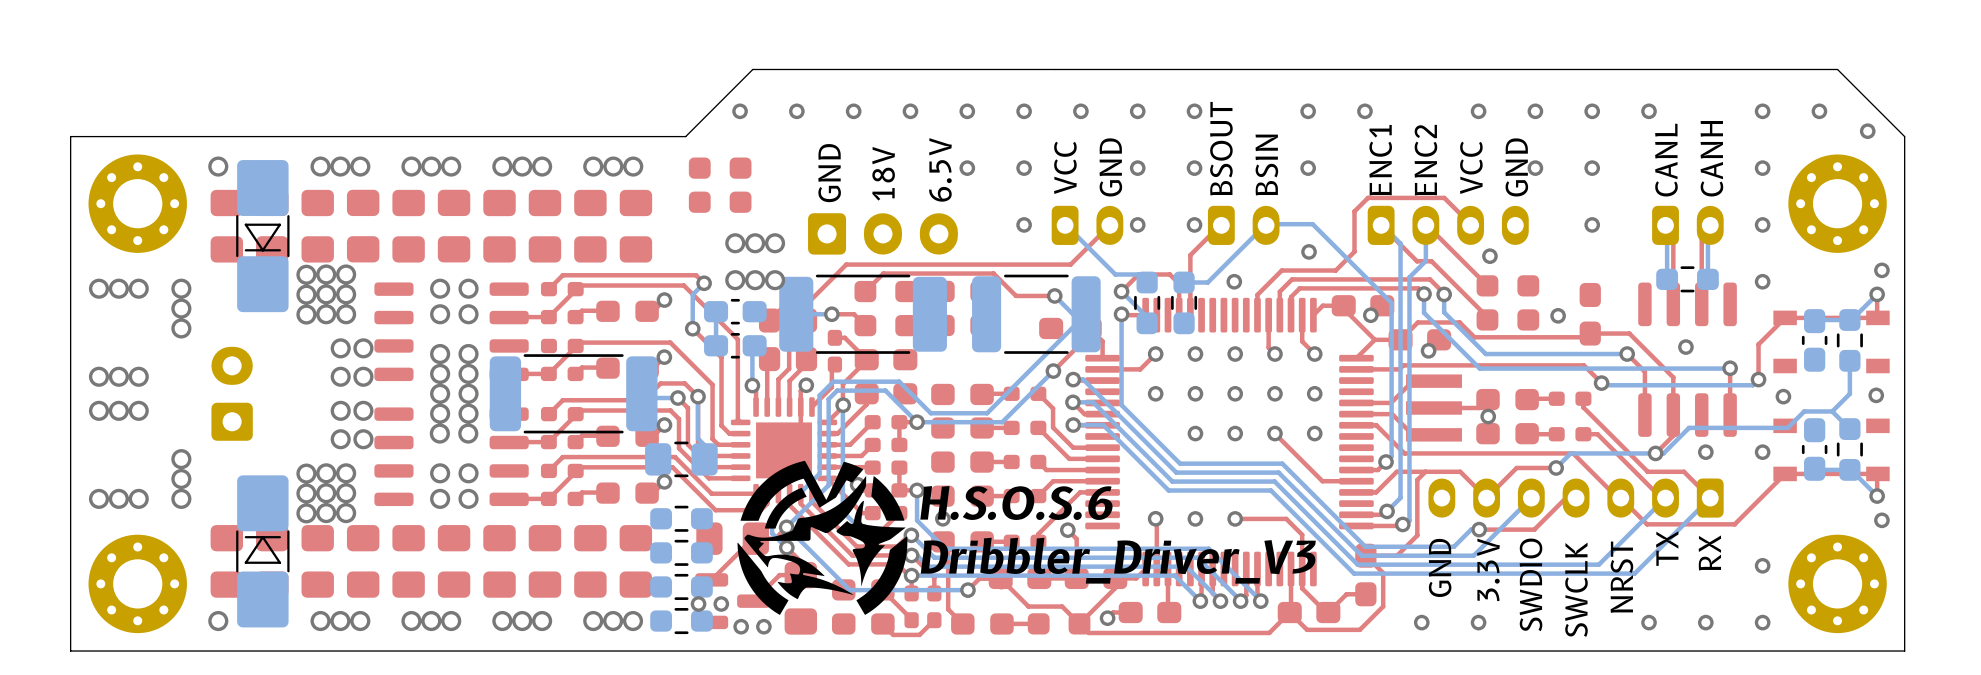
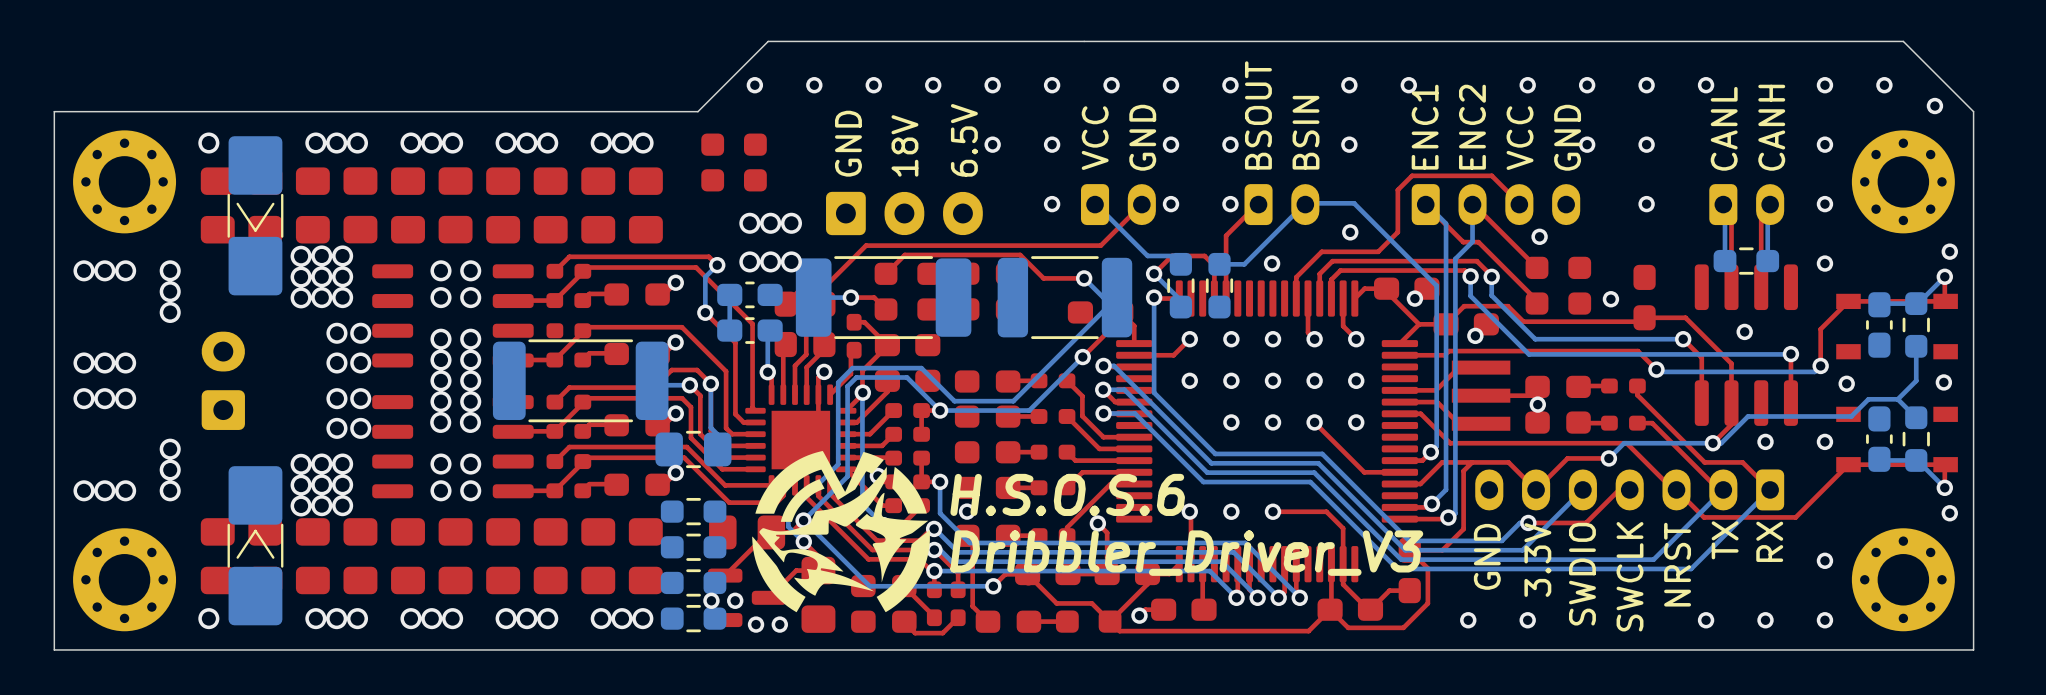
part footprint: [236, 160, 290, 313] -> [227, 136, 284, 296]
part footprint: [236, 475, 290, 628] -> [227, 466, 284, 626]

